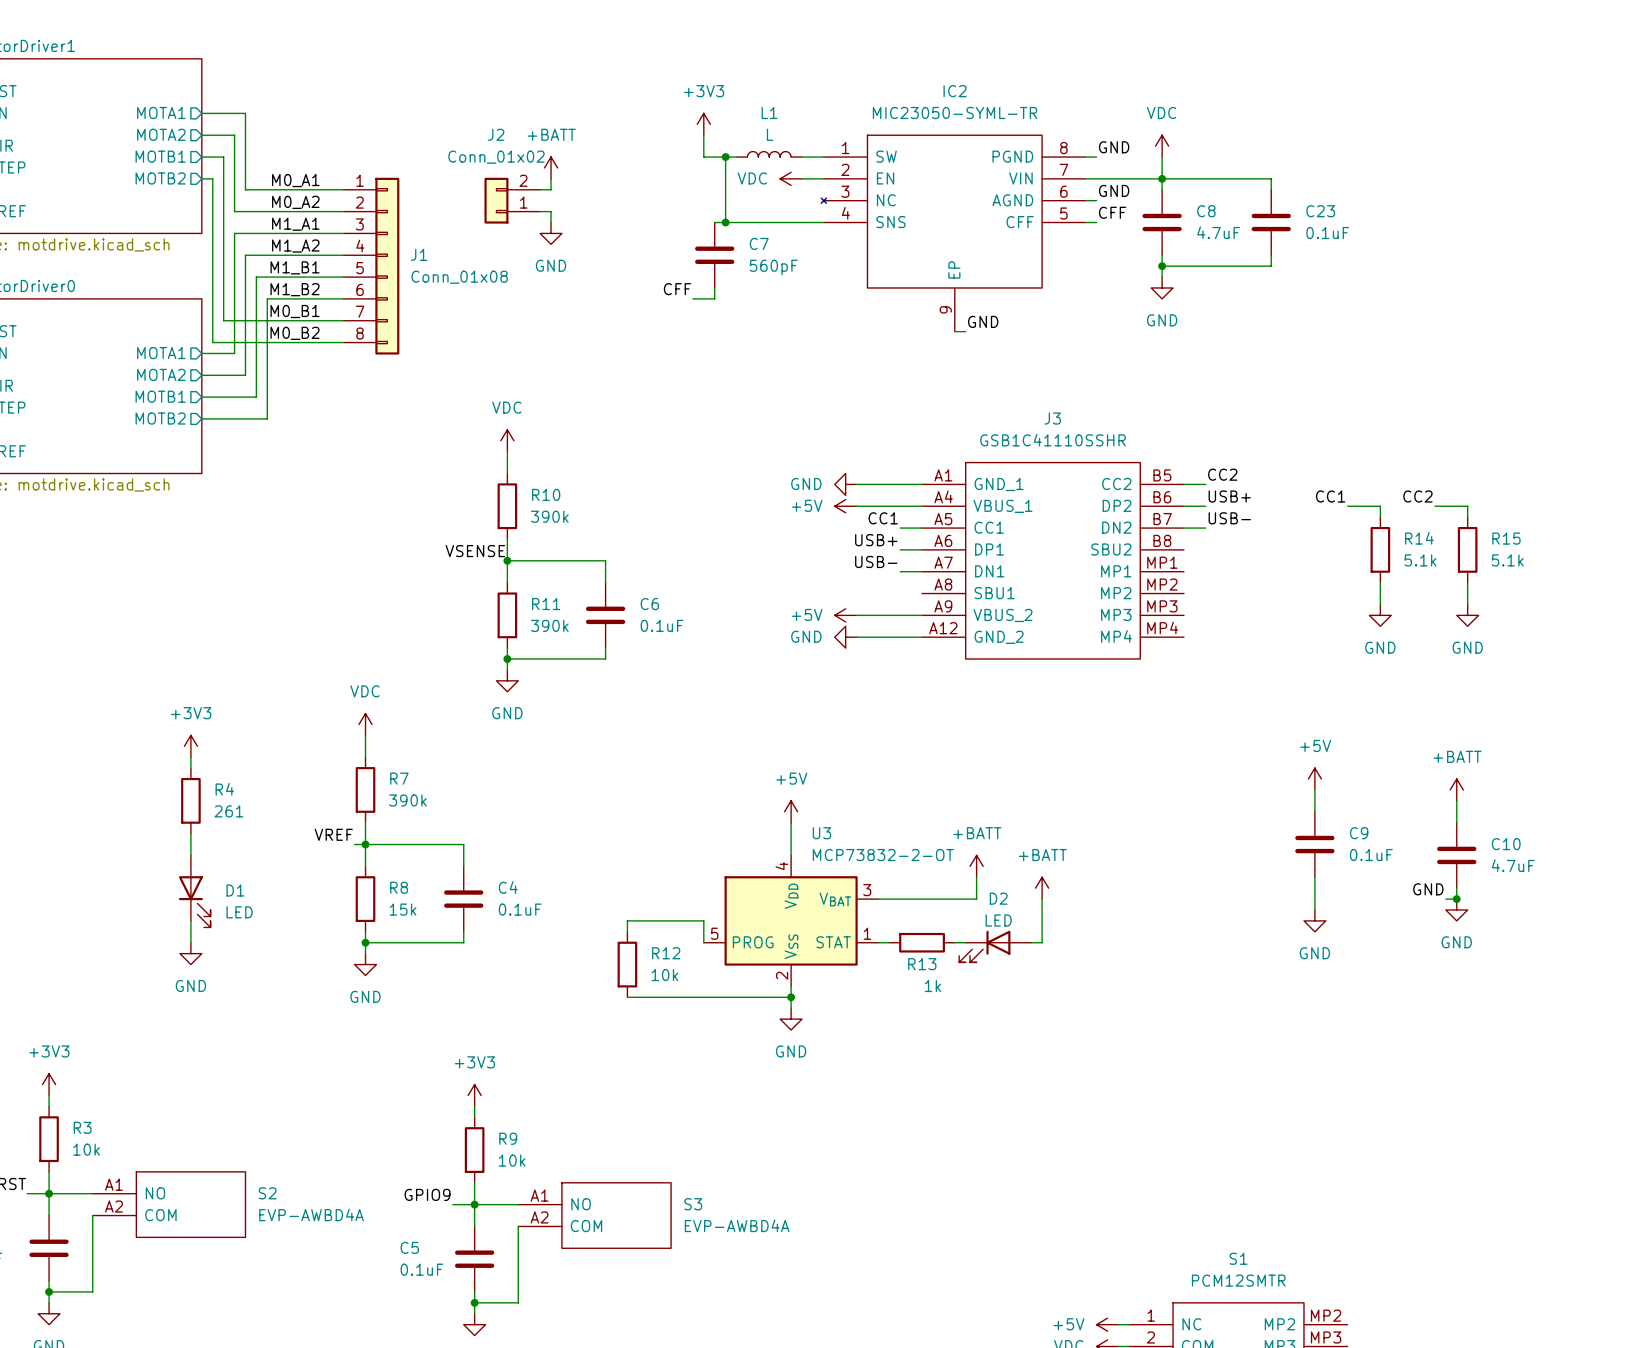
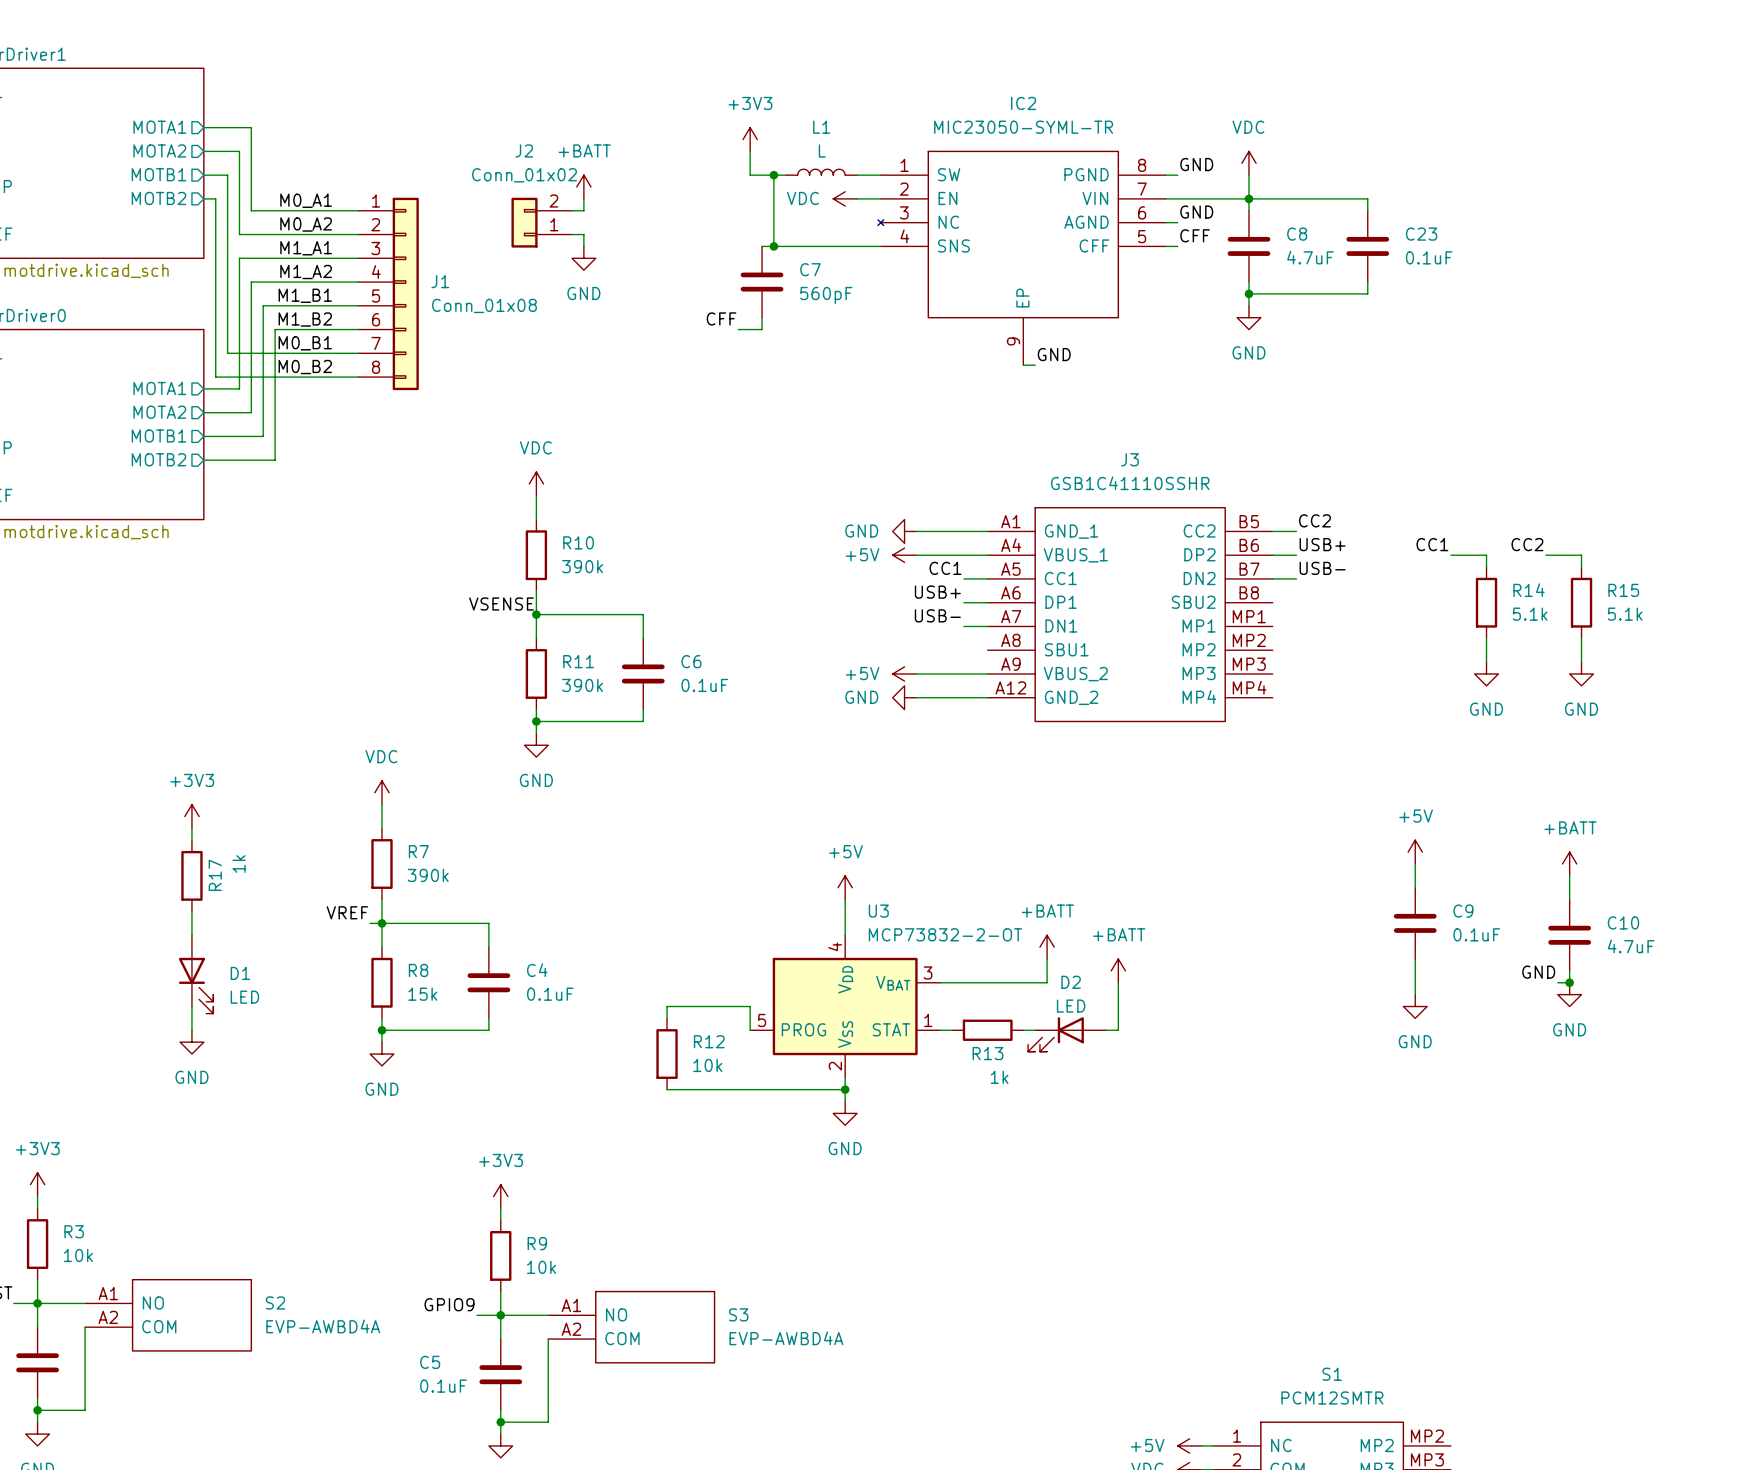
R4 name: R4 (224, 789) -> R17 (215, 875)
R4 value: 261 (228, 811) -> 1k (239, 864)

